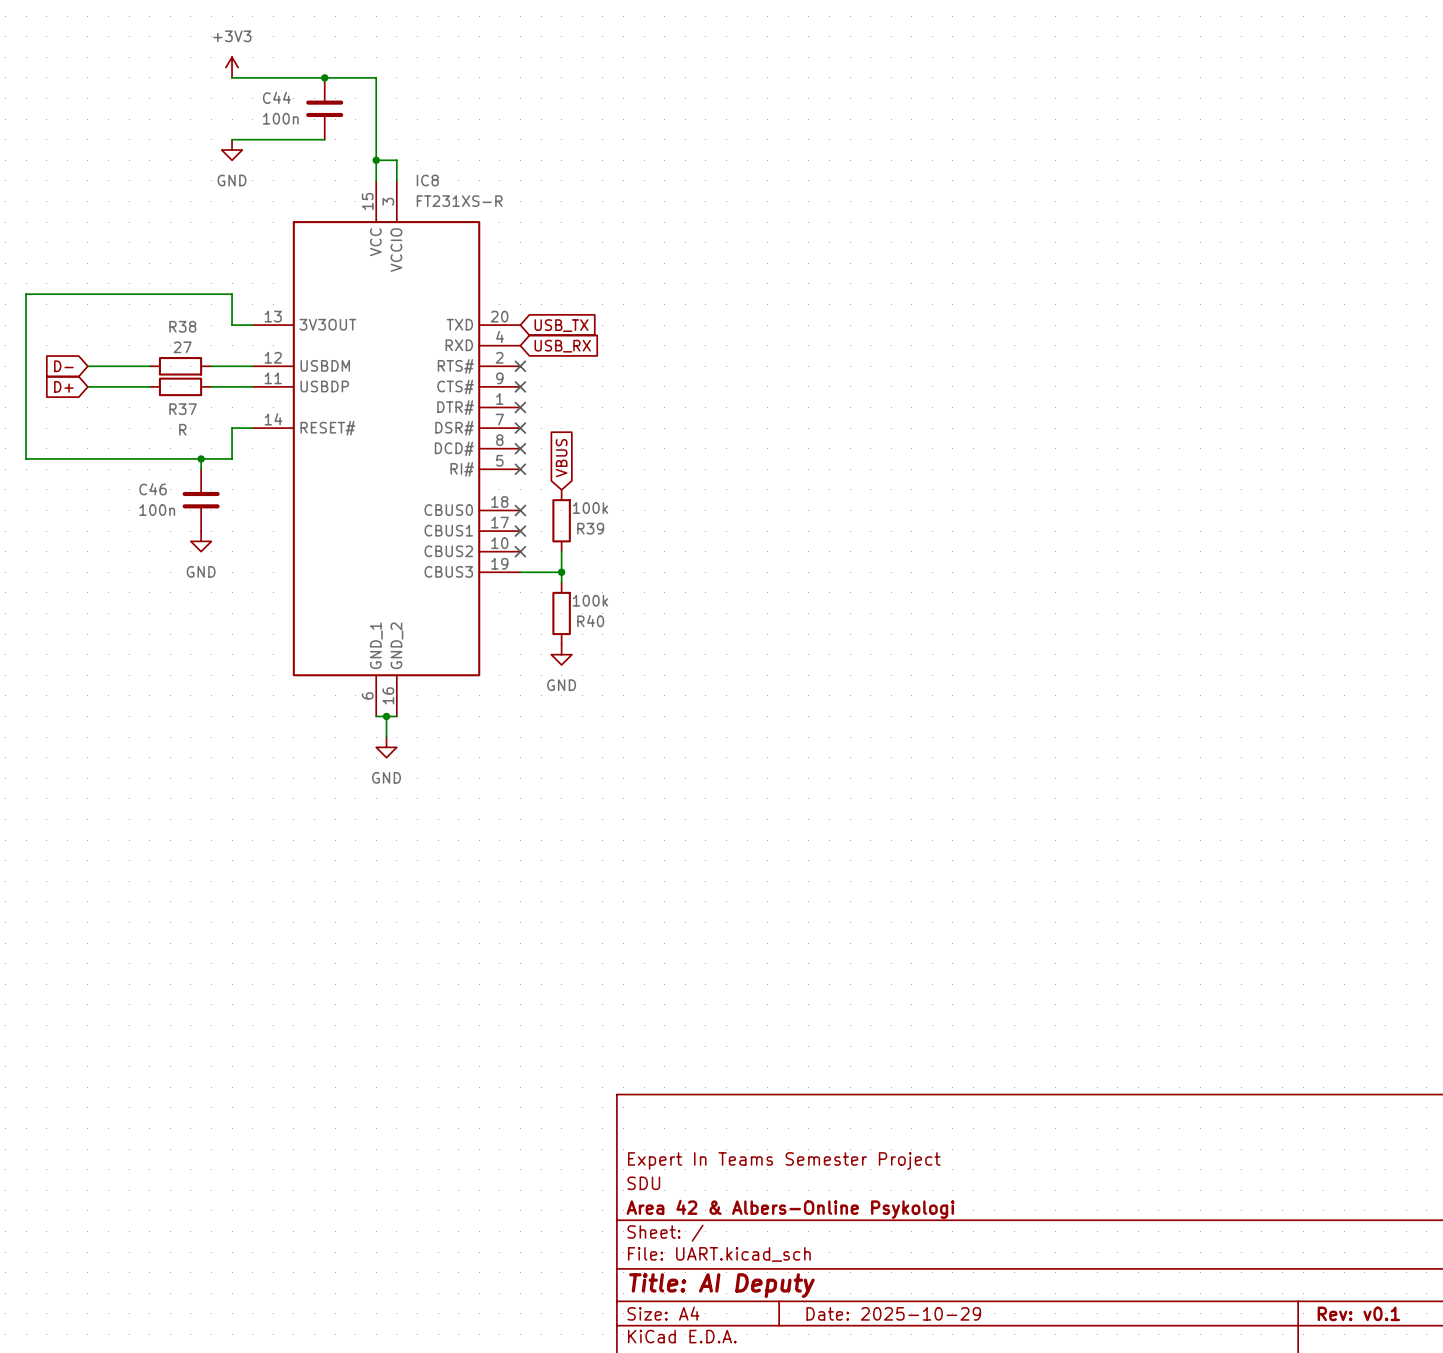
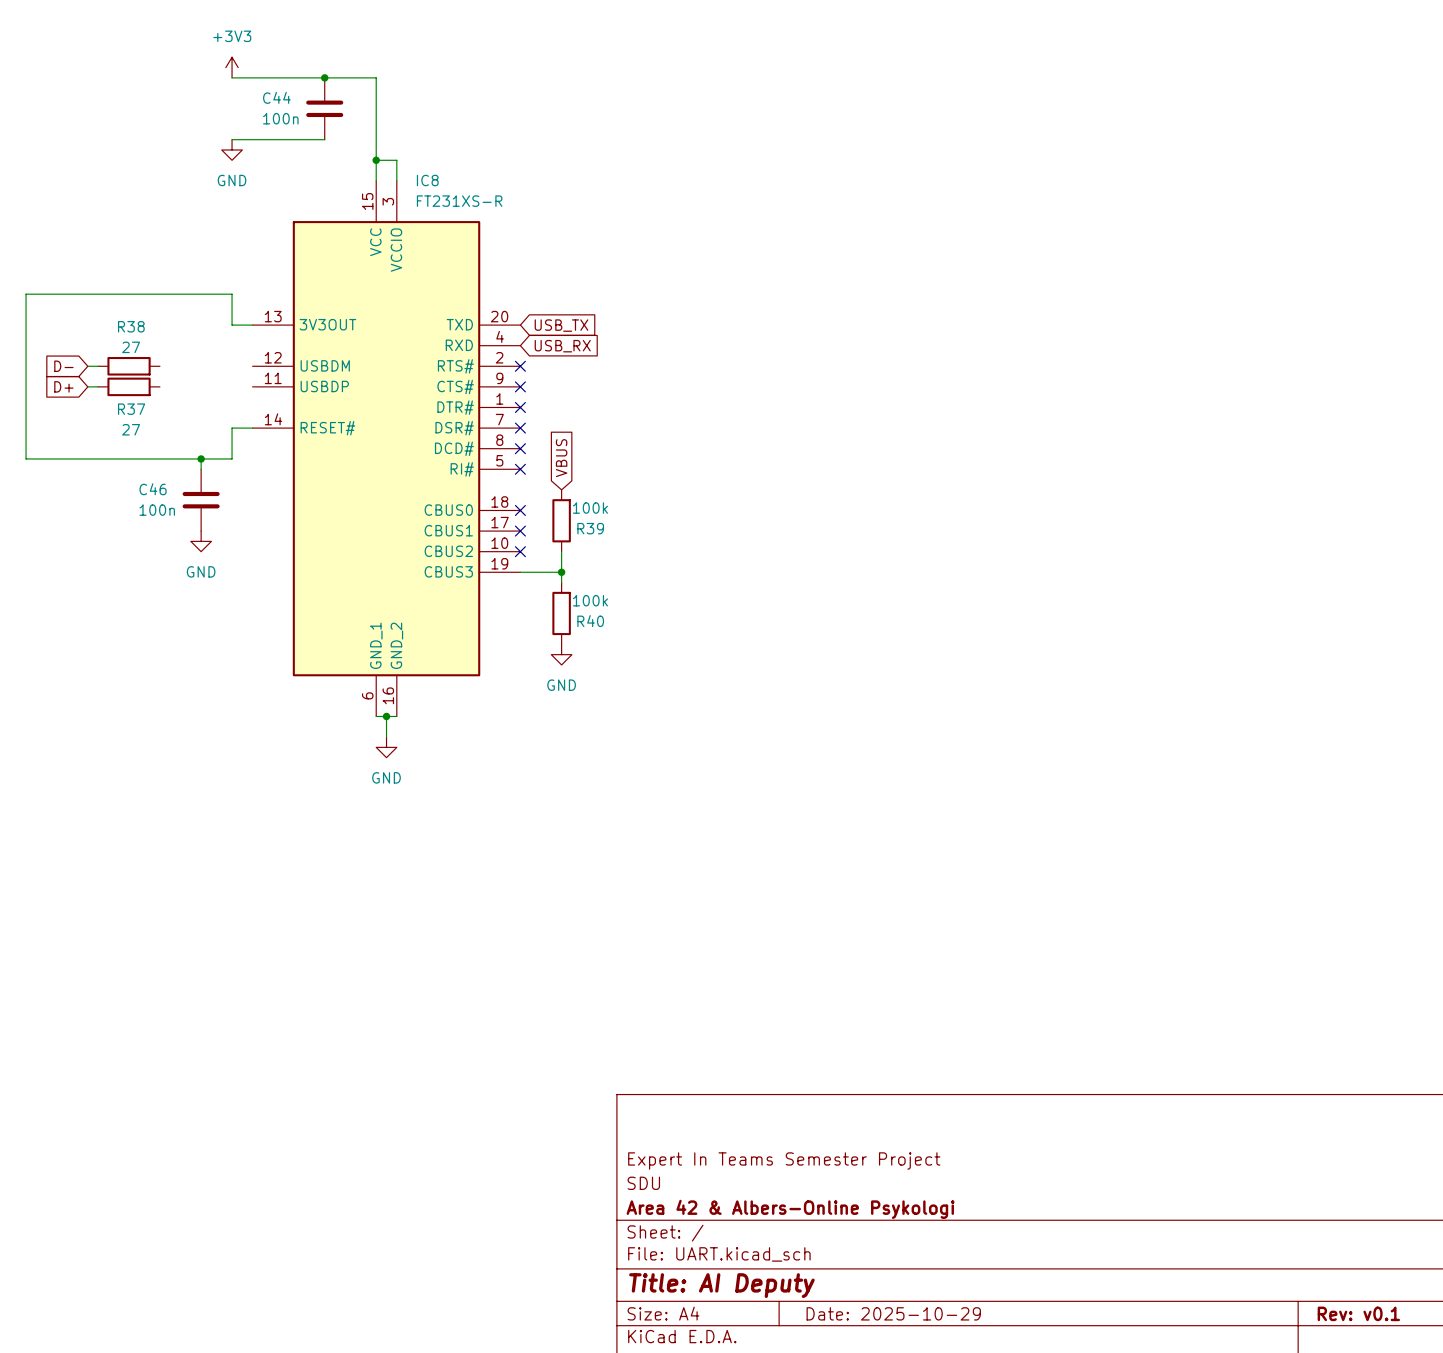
wire: (98, 366) (149, 366) -> none
R38 position: (180, 366) -> (129, 366)
wire: (211, 366) (252, 366) -> none
wire: (98, 386) (149, 386) -> none
R37 position: (180, 386) -> (129, 386)
wire: (211, 386) (252, 386) -> none
R37 value: R (182, 429) -> 27 (131, 429)

